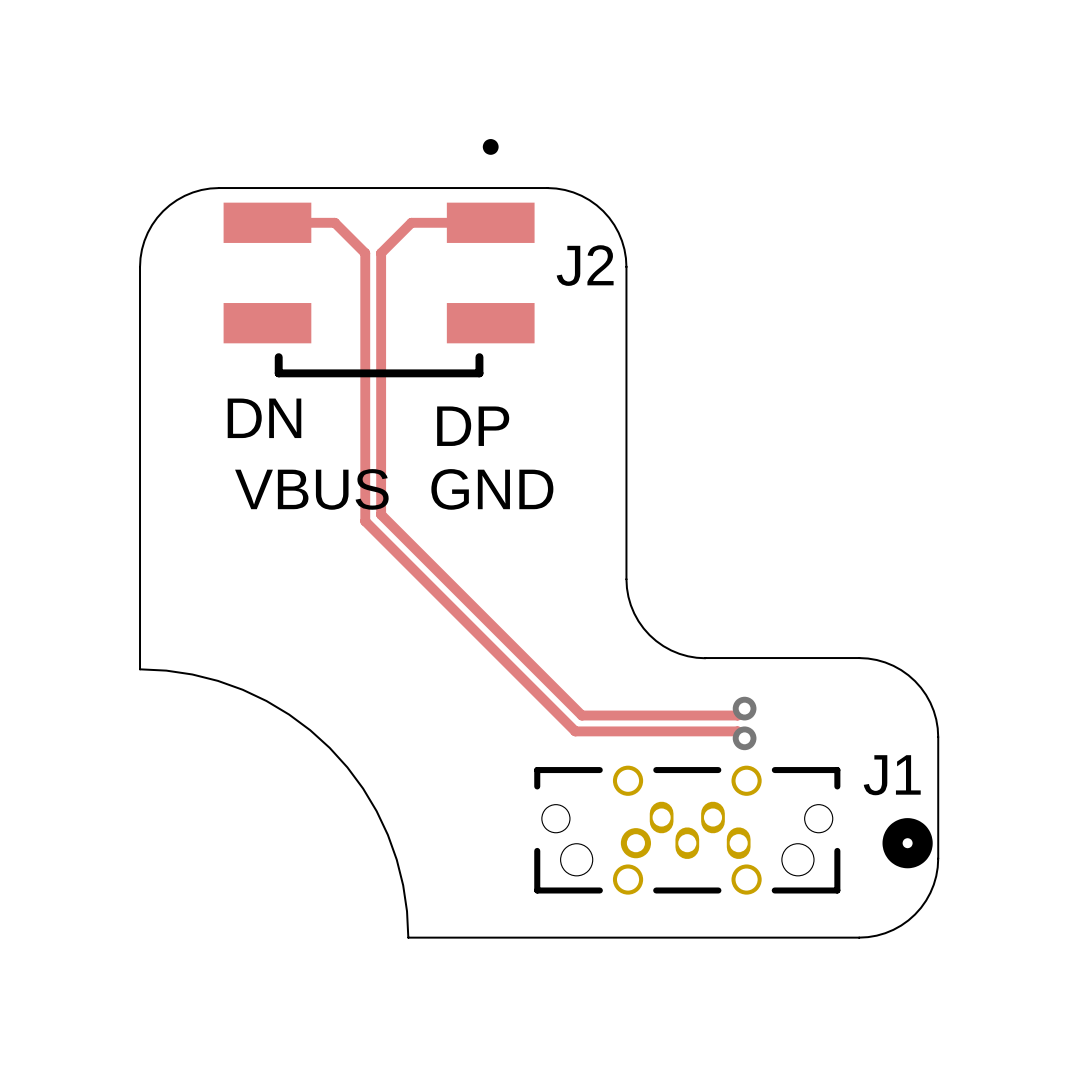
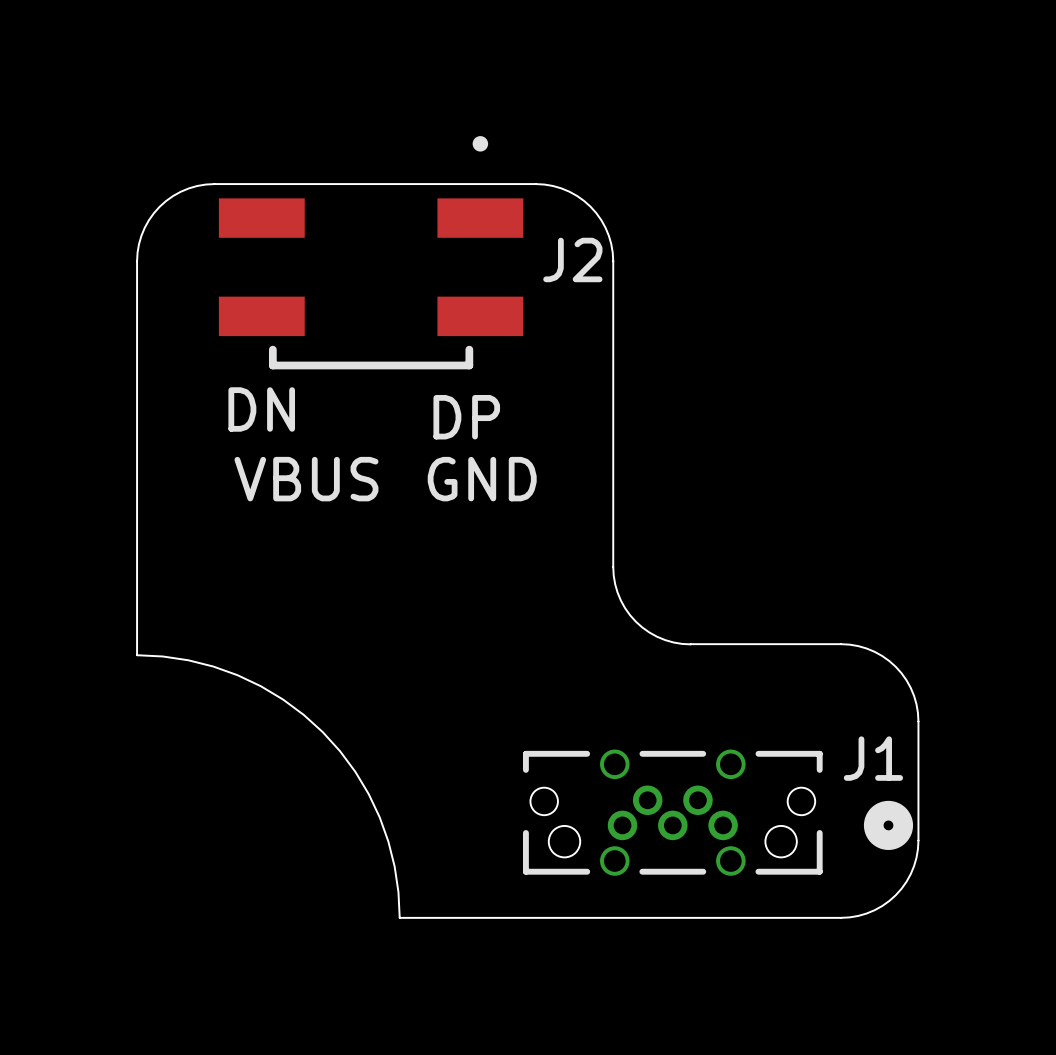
track: (267, 222) (334, 222) (365, 253) (365, 521) (575, 731) (737, 731) (744, 738) -> none
track: (490, 222) (411, 222) (381, 253) (381, 514) (581, 715) (737, 715) (744, 708) -> none
via: (744, 708) -> none
via: (744, 738) -> none
J1 footprint: [534, 765, 933, 895] -> [522, 749, 914, 876]

